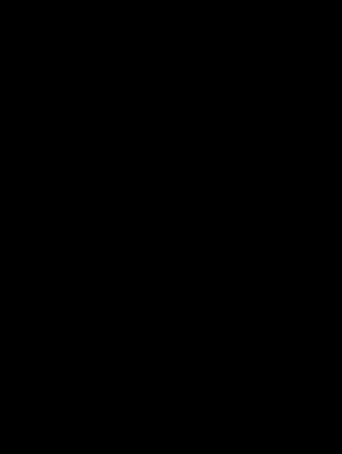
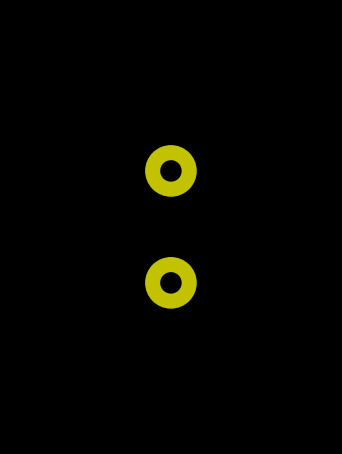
part: none -> (170, 226)

